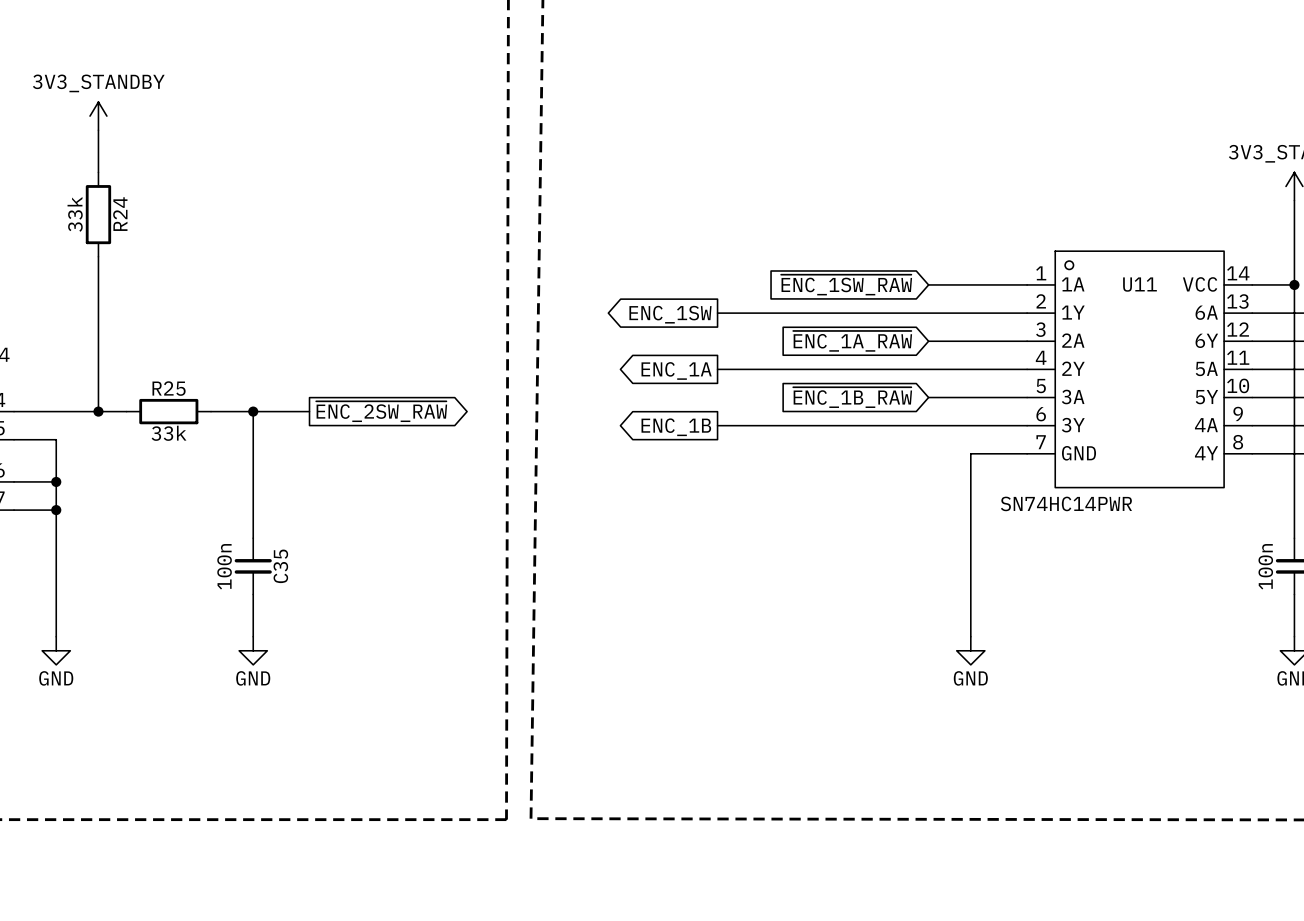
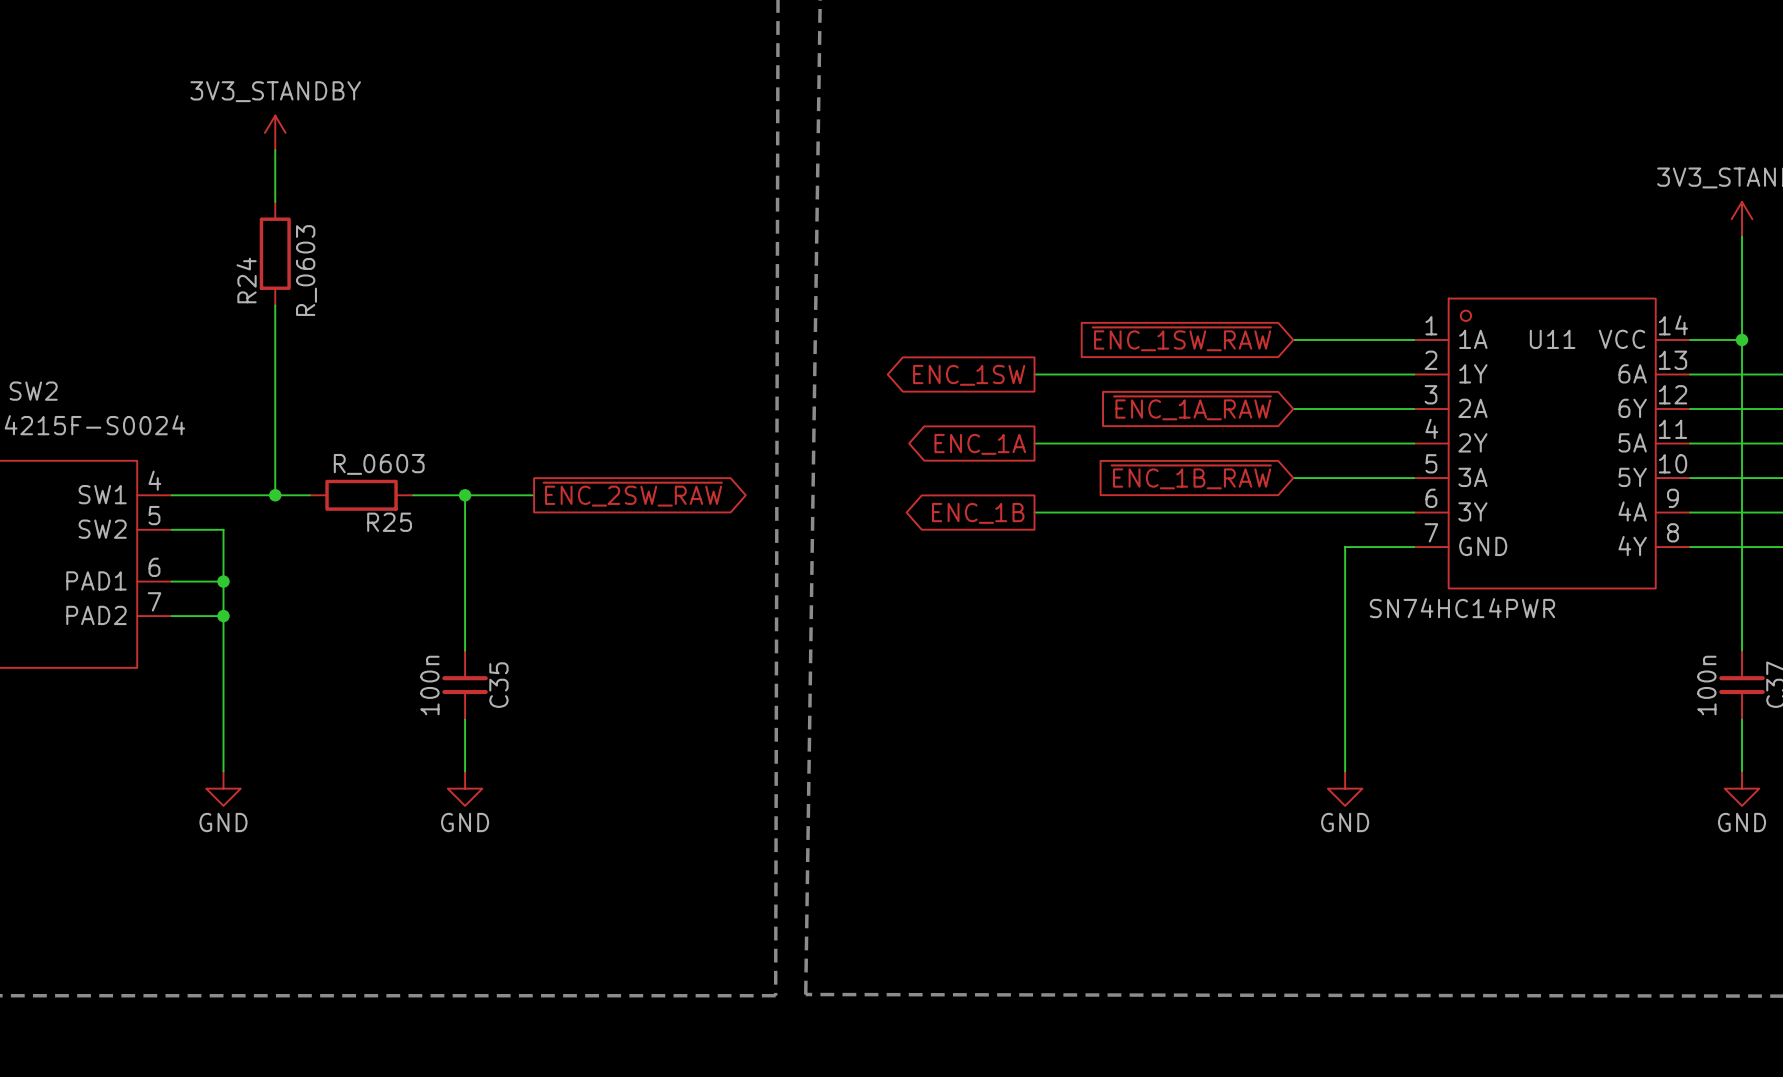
R24 value: 33k (75, 214) -> R_0603 (306, 270)
R24 name position: R24 (120, 214) -> R24 (246, 280)
R25 name position: R25 (169, 388) -> R25 (389, 522)
R25 value: 33k (169, 433) -> R_0603 (379, 464)

